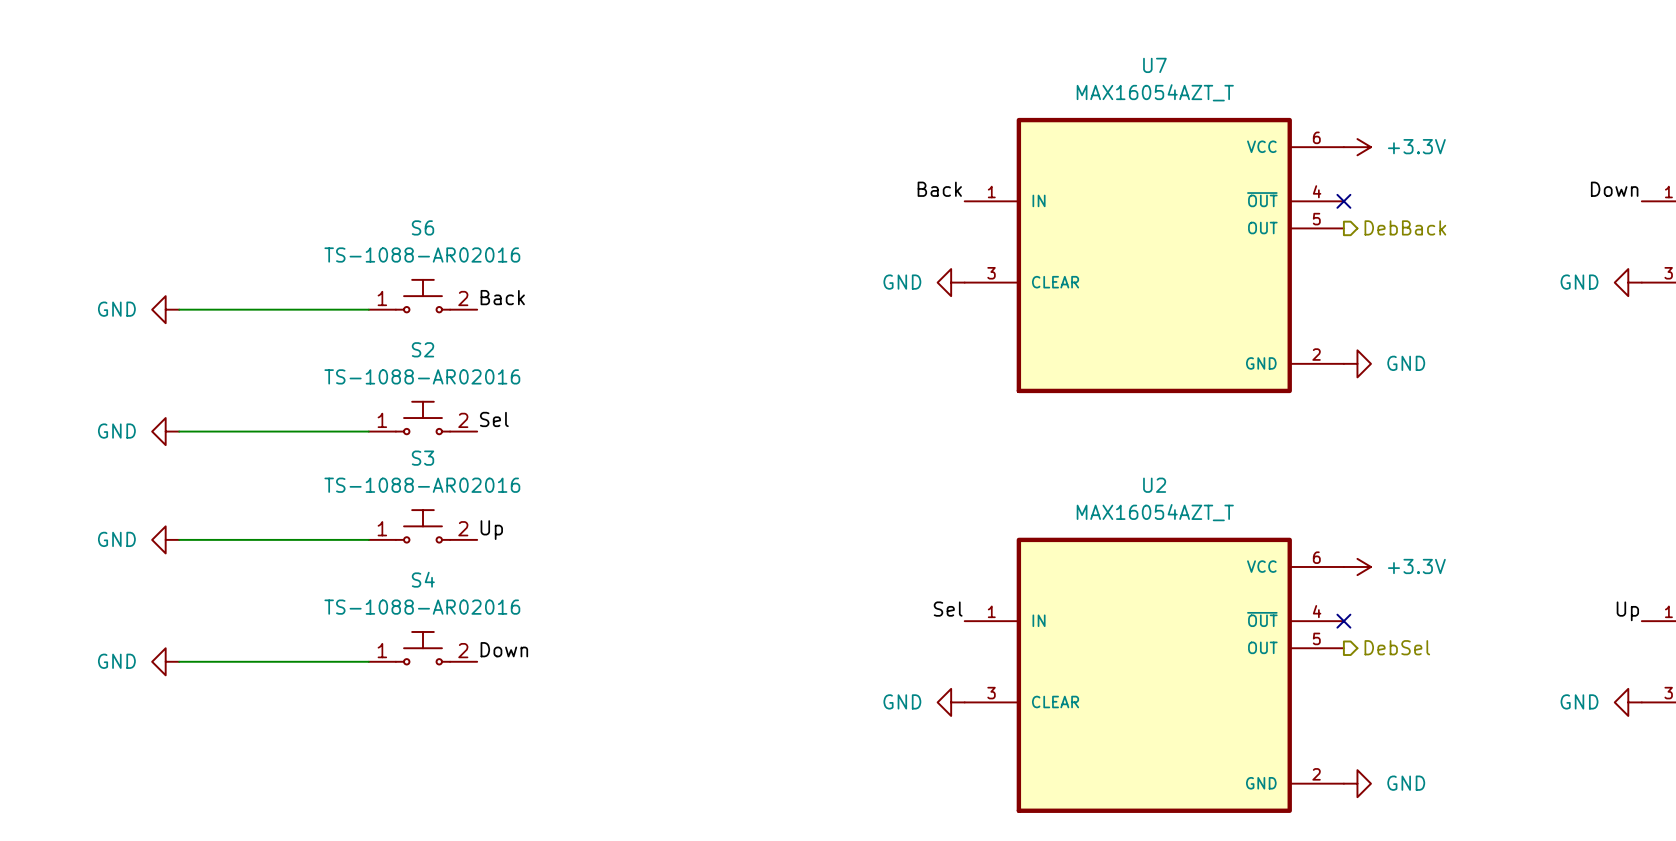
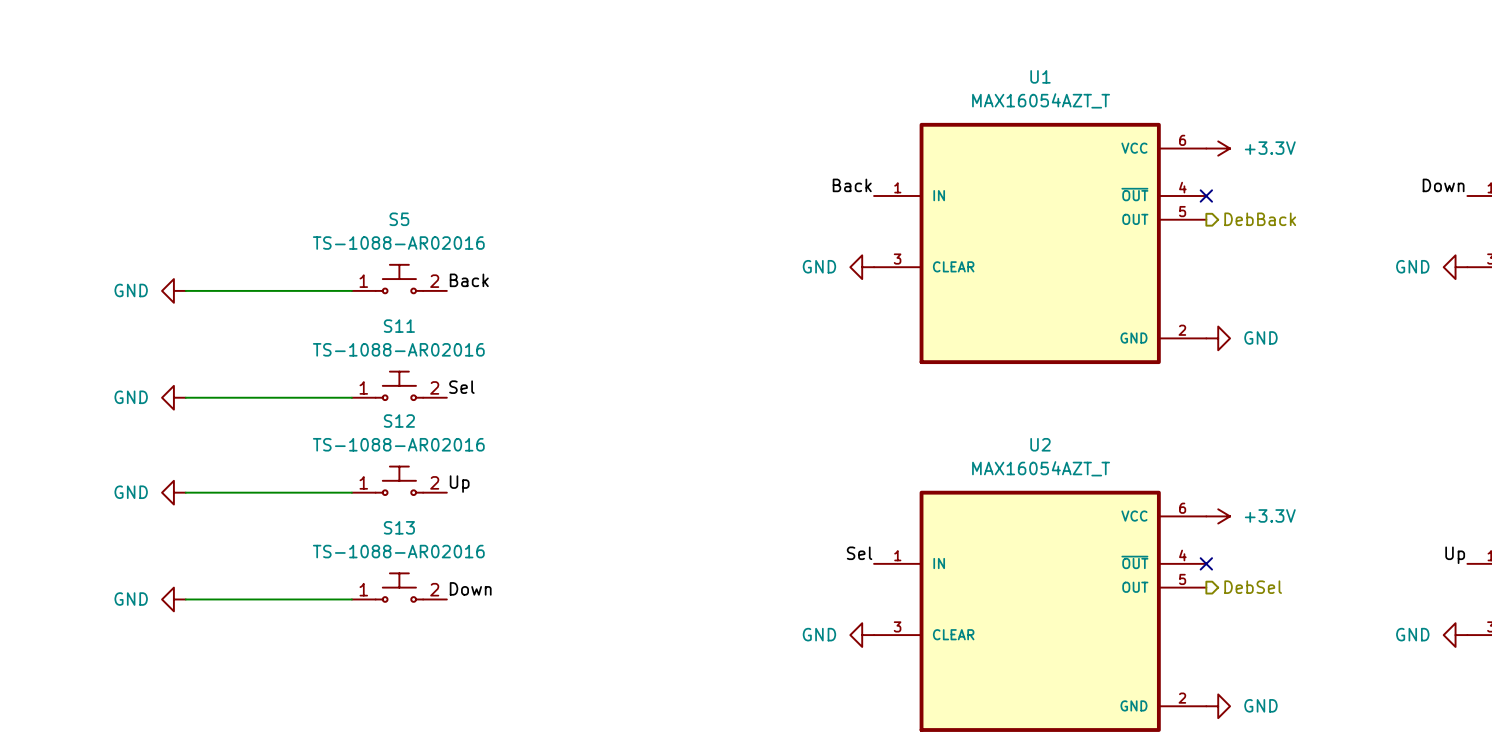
U7 name: U7 (1154, 65) -> U1 (1040, 76)
S6 name: S6 (422, 227) -> S5 (399, 219)
S2 name: S2 (422, 349) -> S11 (399, 326)
S3 name: S3 (422, 458) -> S12 (399, 421)
S4 name: S4 (423, 579) -> S13 (399, 527)

